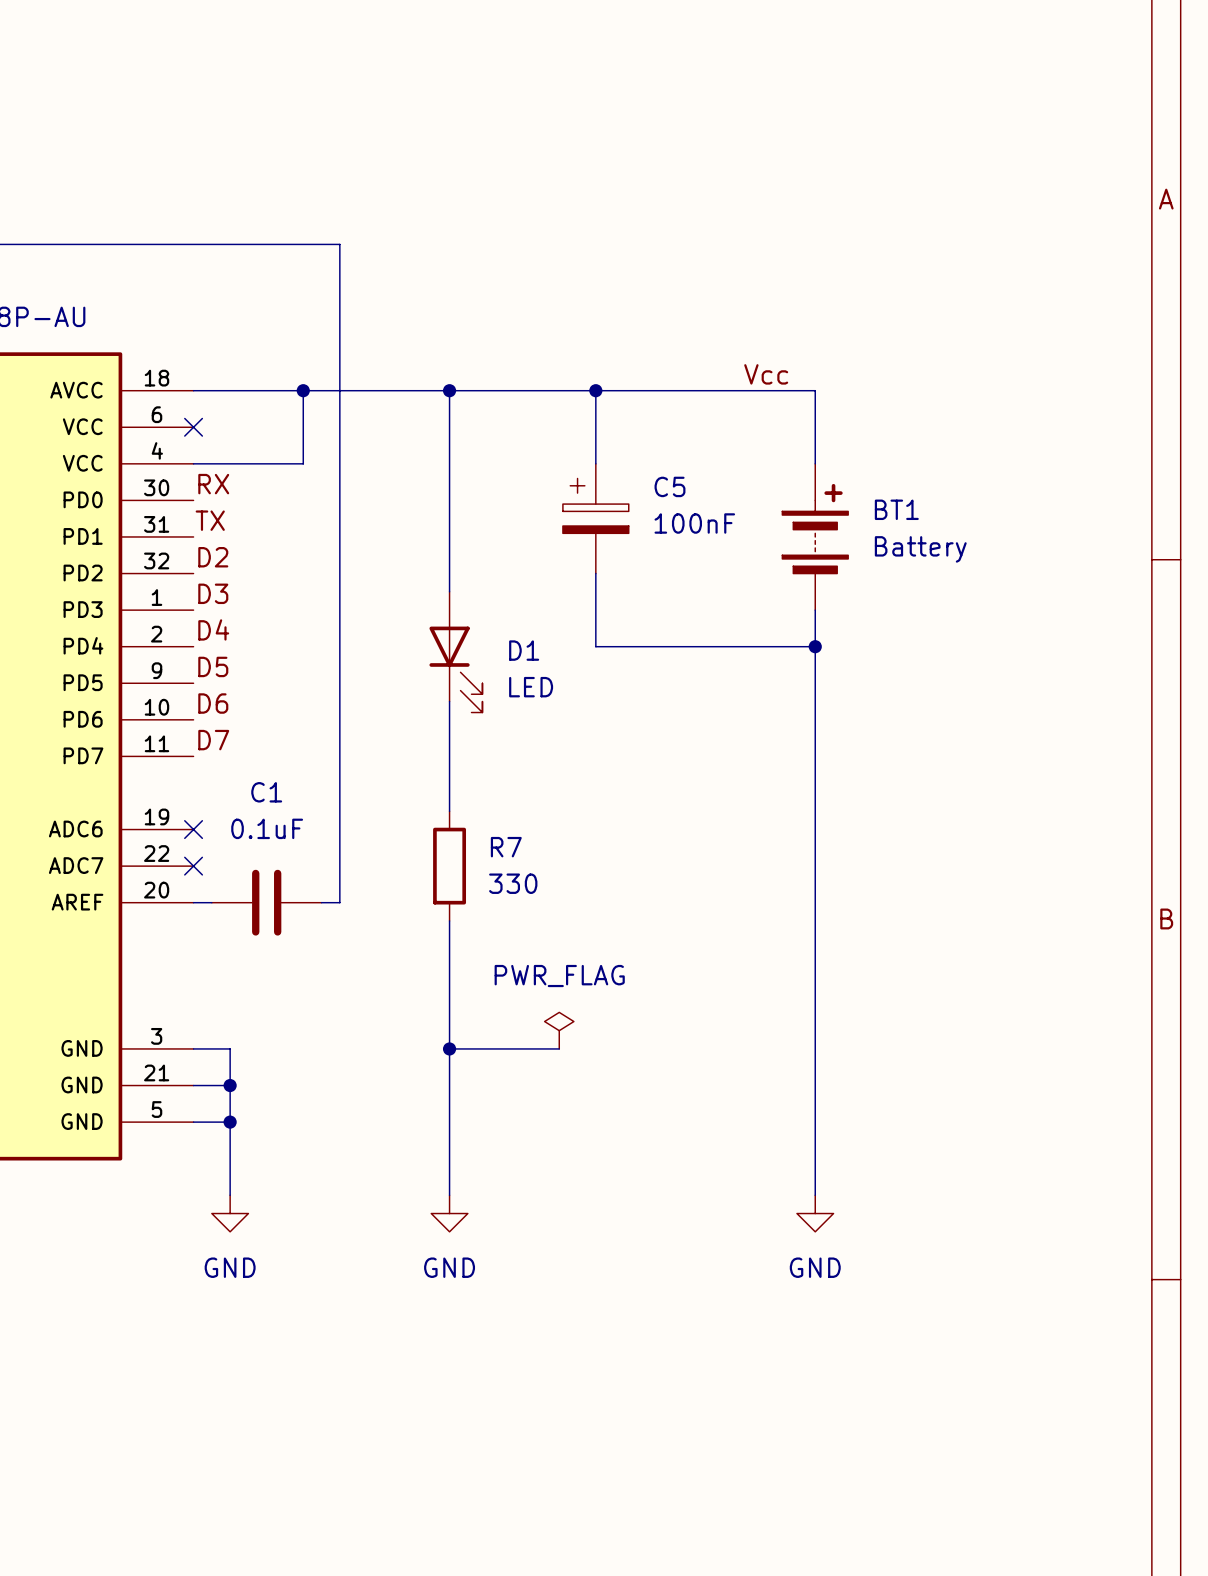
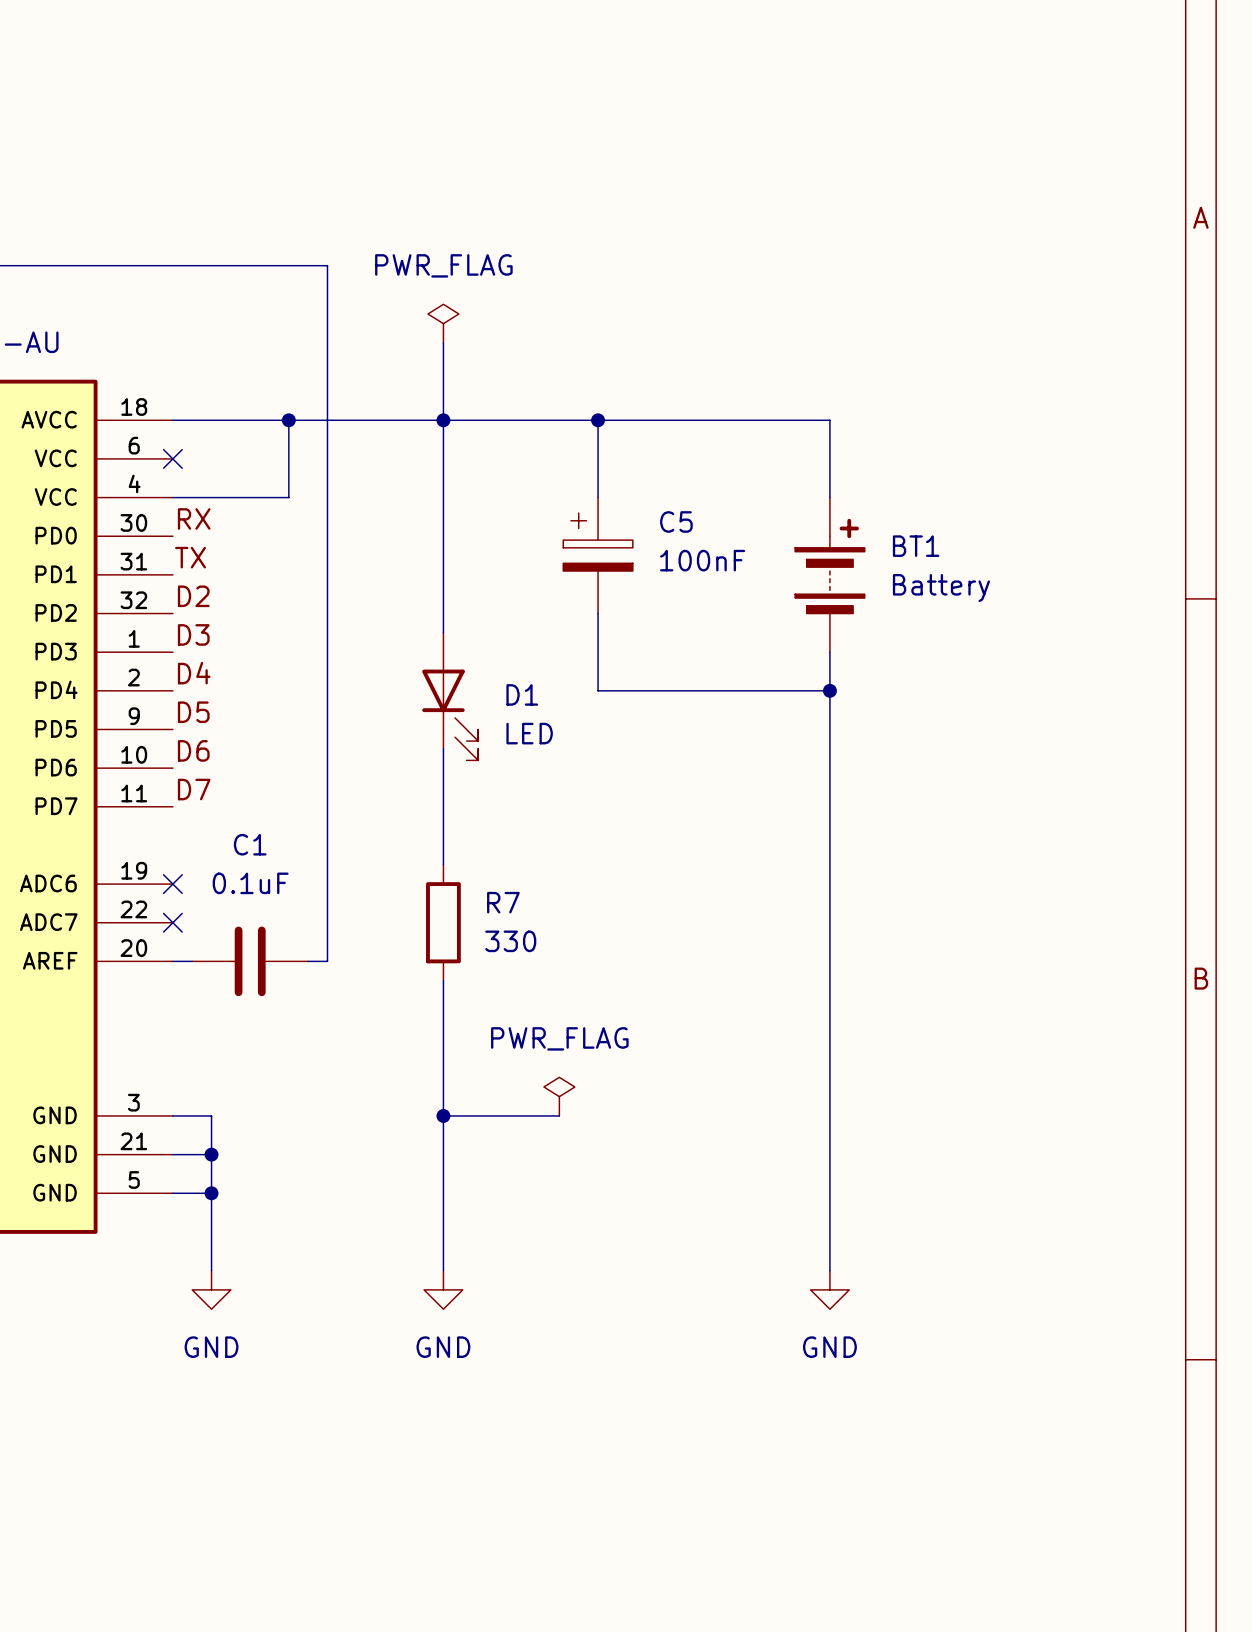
power symbol: none -> PWR_FLAG (443, 323)
wire: none -> (443, 342) (443, 420)
label: Vcc (766, 374) -> none

